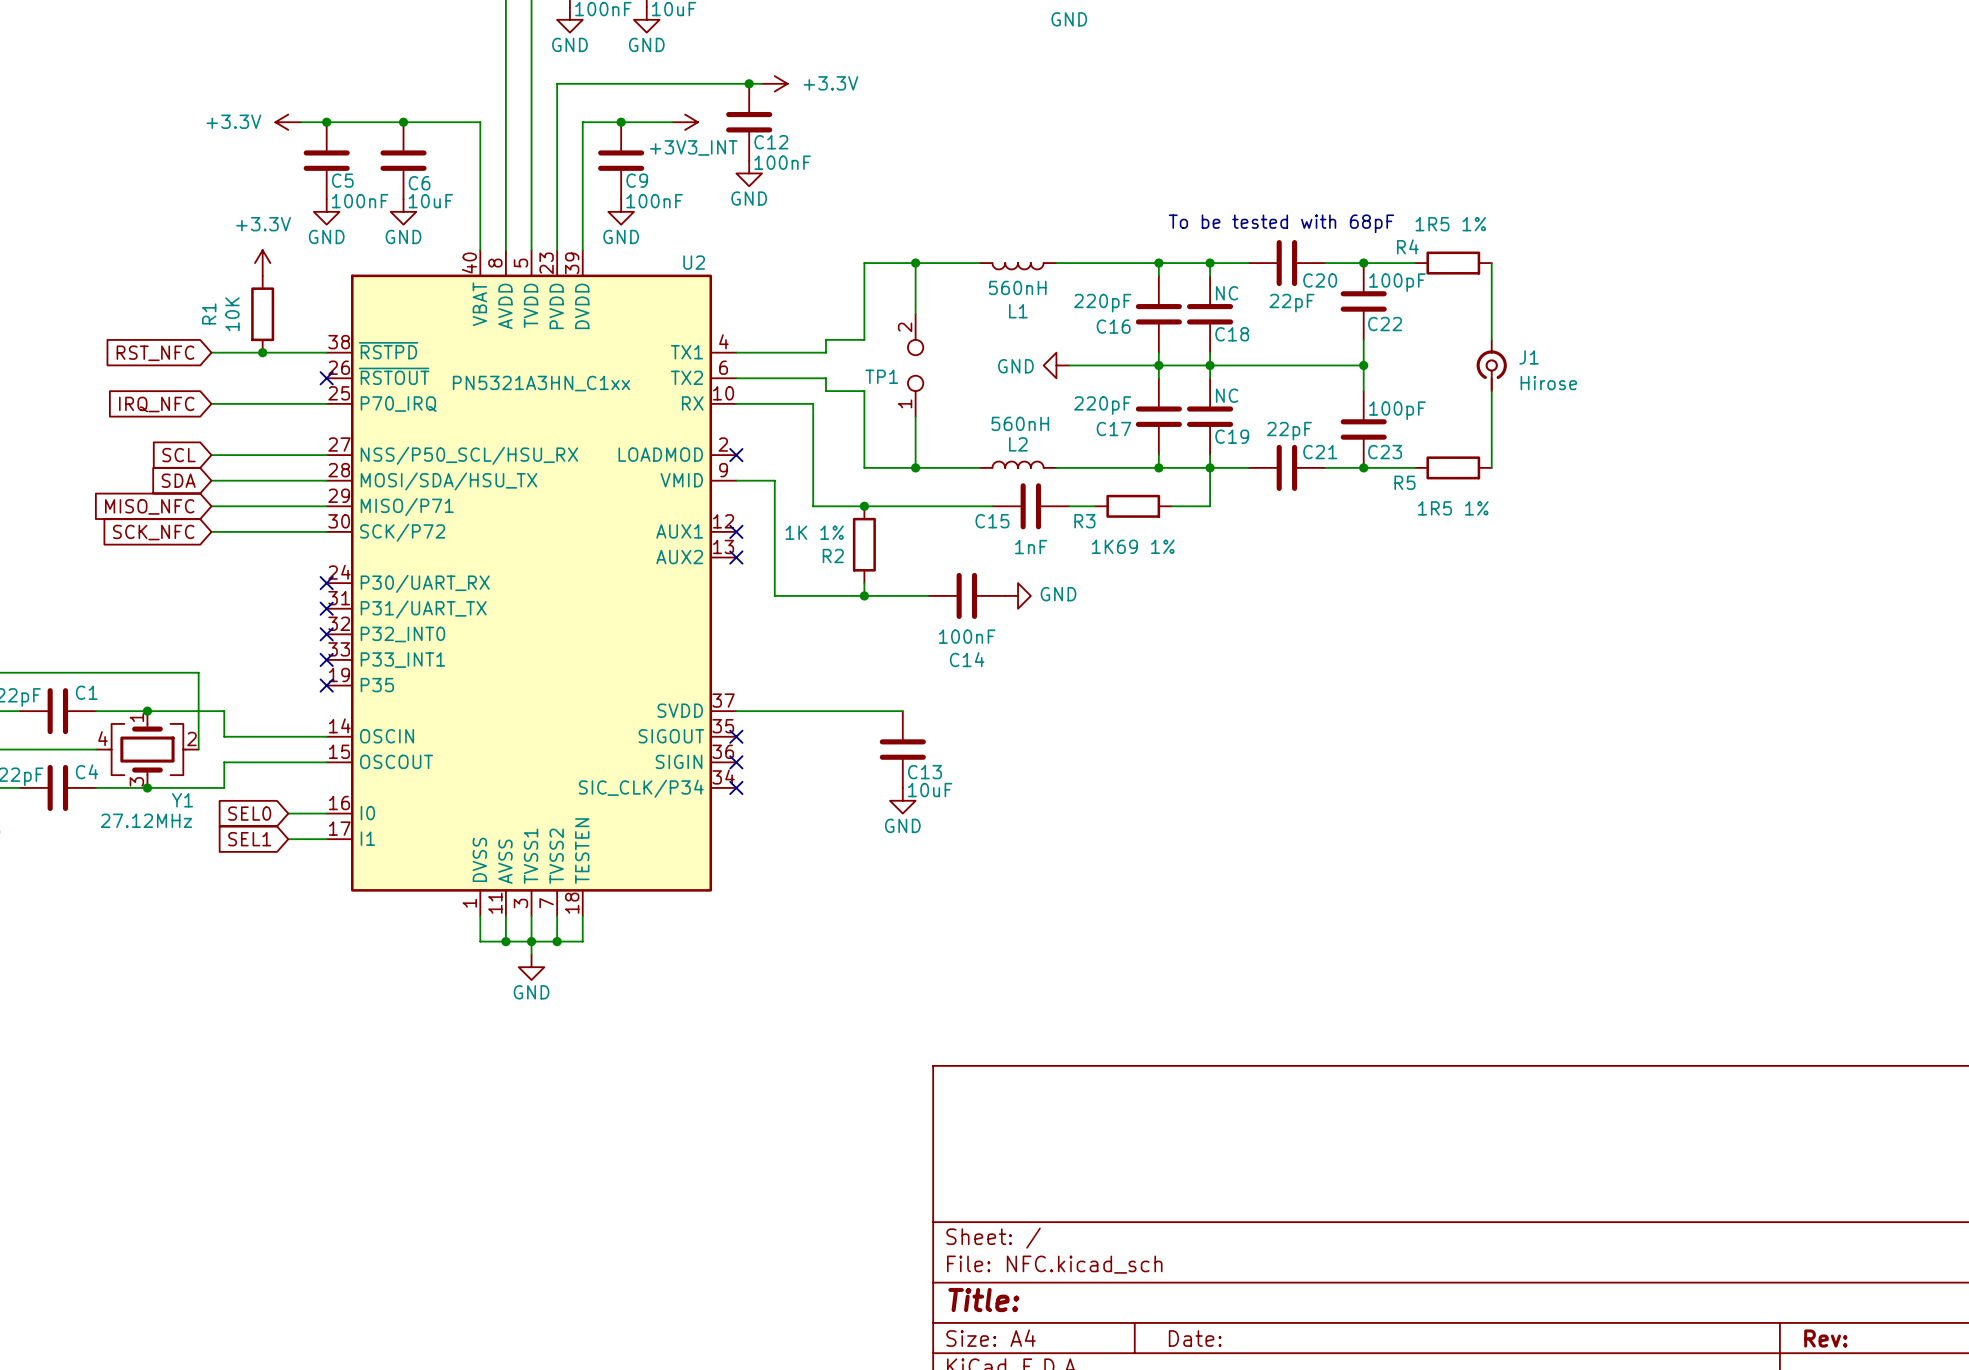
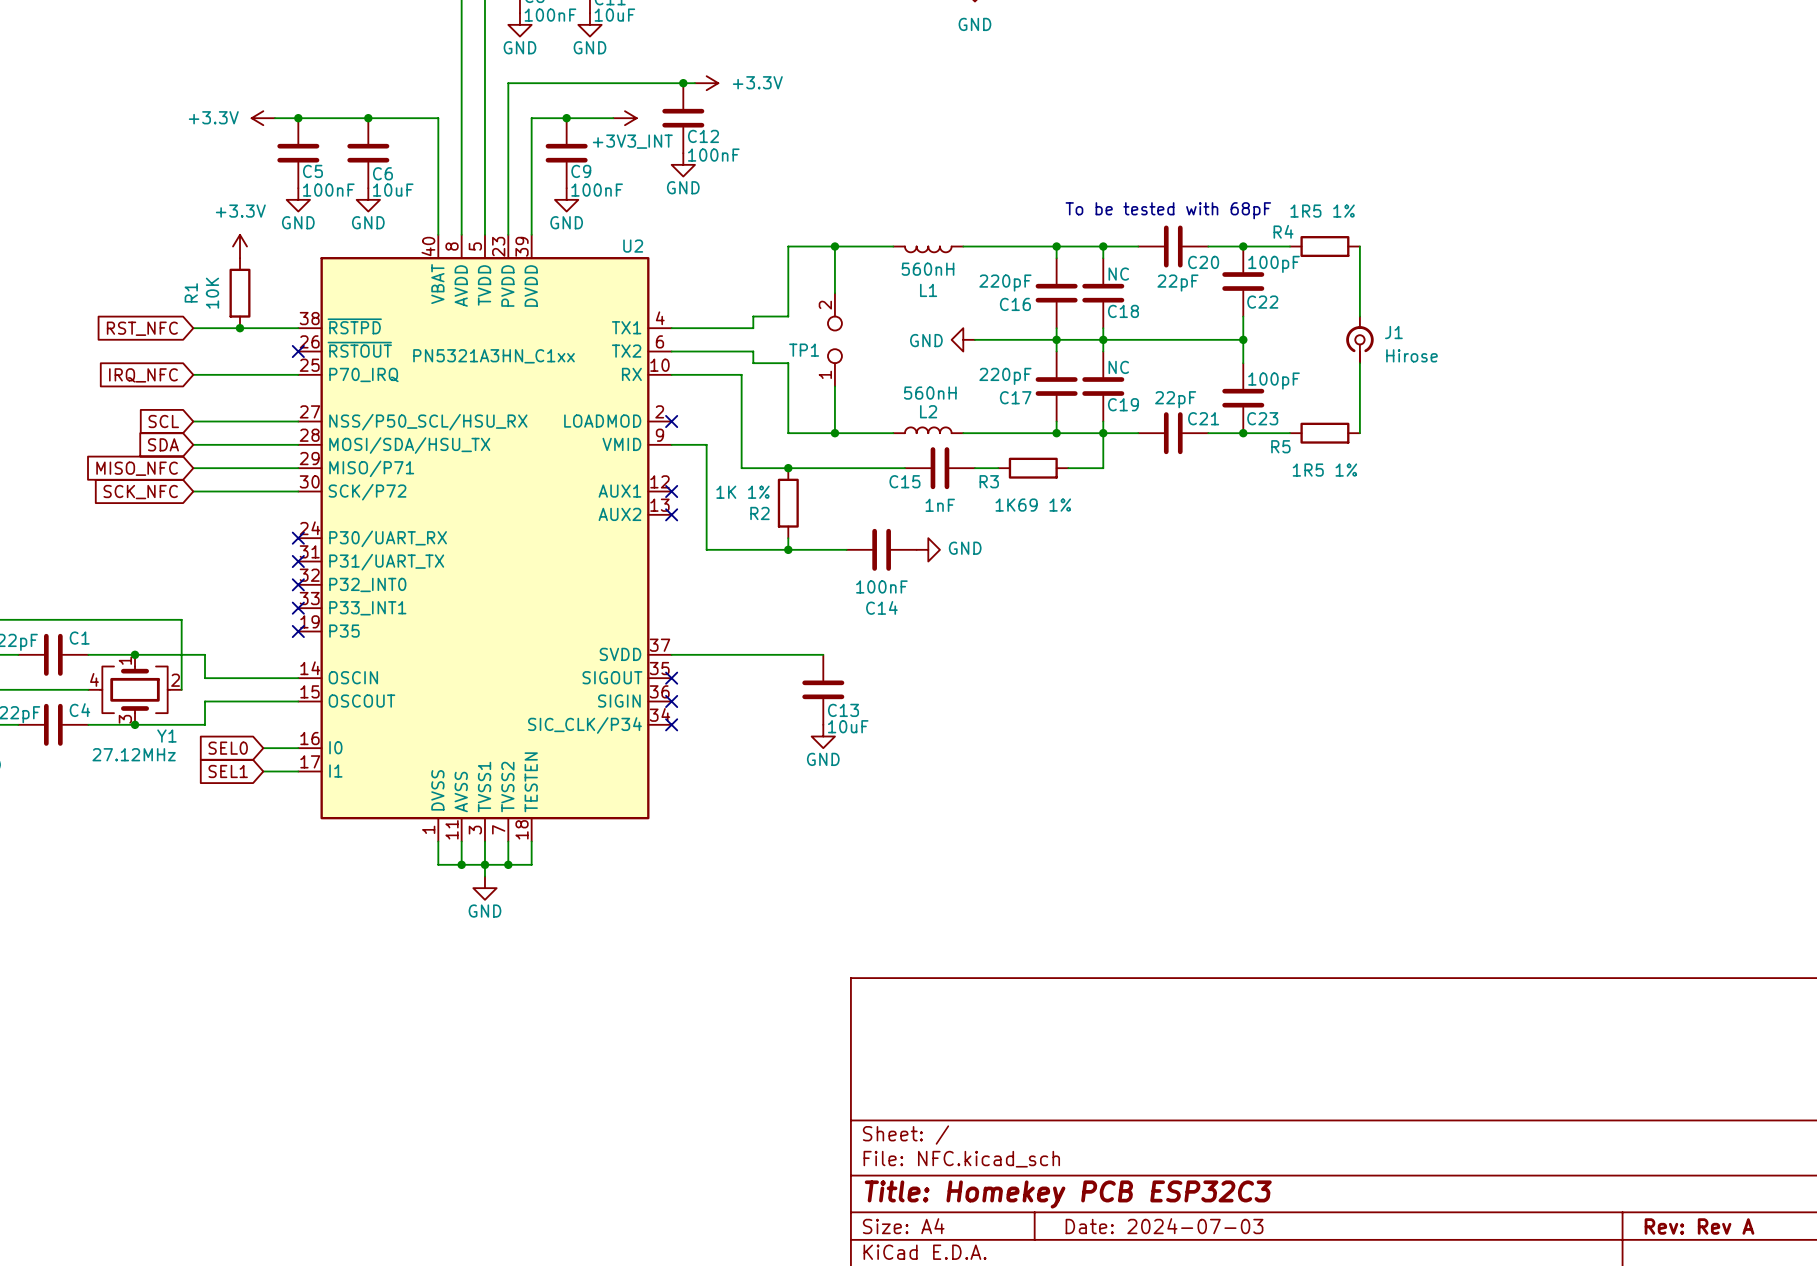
title block: Title: (983, 1300) -> Title: Homekey PCB ESP32C3 (1068, 1194)
title block: Date: (1195, 1338) -> Date: 2024-07-03 (1164, 1226)
title block: Rev: (1825, 1338) -> Rev: Rev A (1699, 1226)

